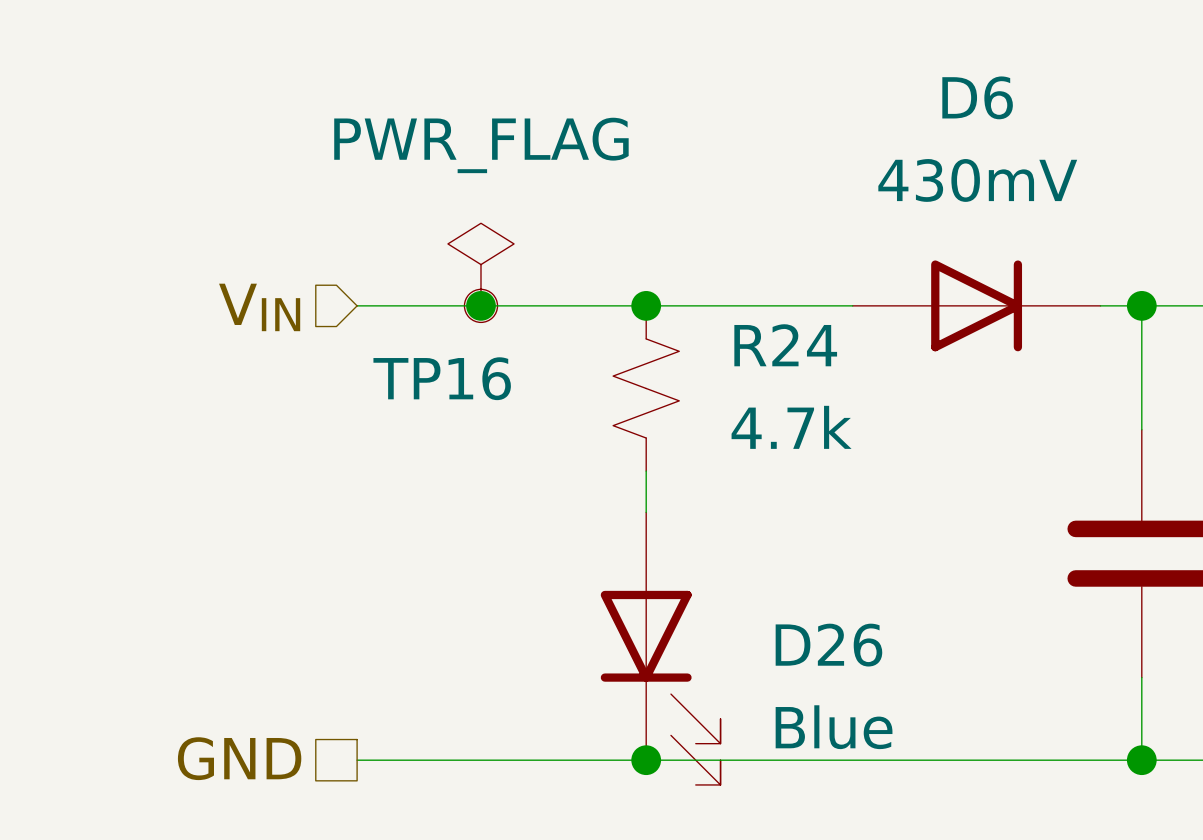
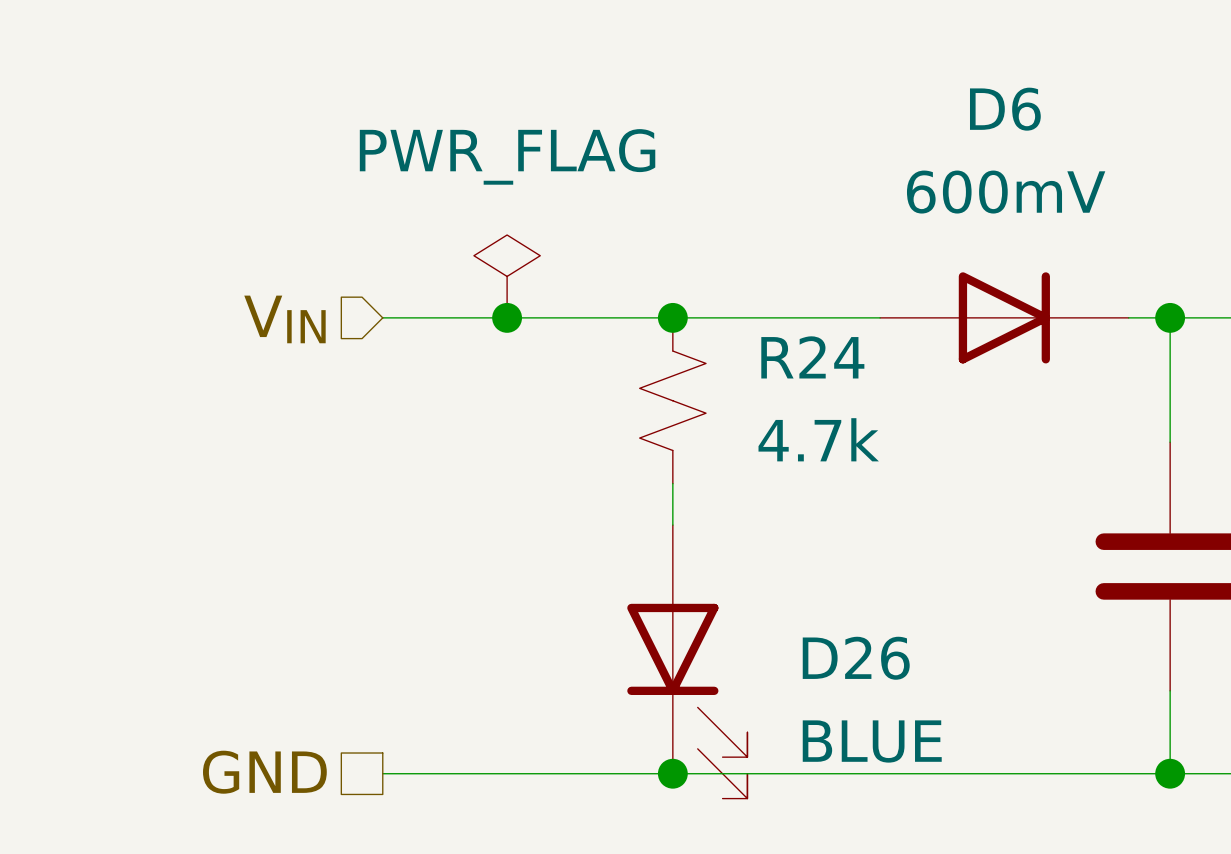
D6 value: 430mV (977, 180) -> 600mV (1006, 192)
TP16: (480, 305) -> none
D26 value: Blue (834, 727) -> BLUE (872, 741)

